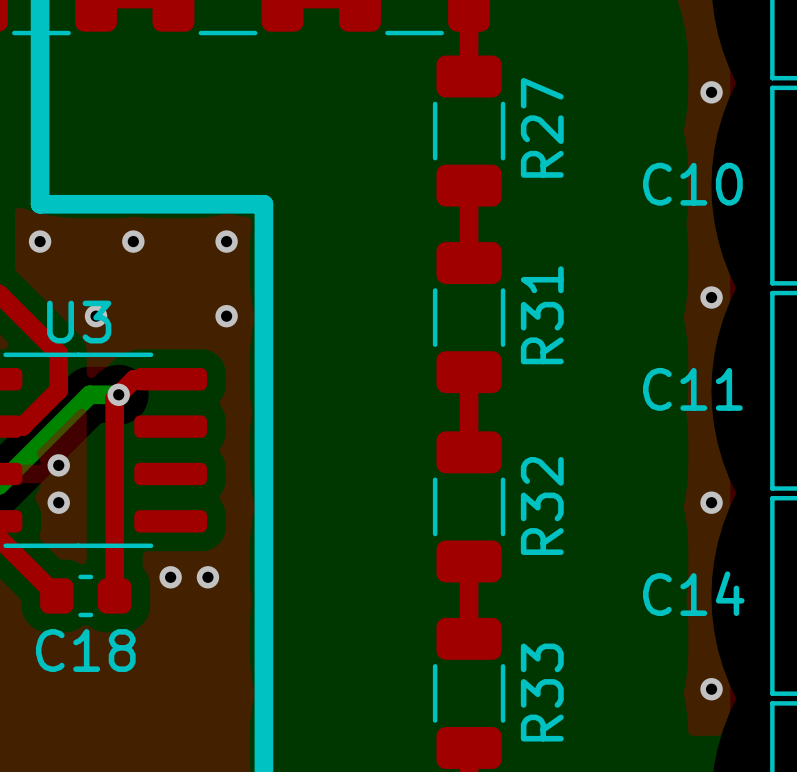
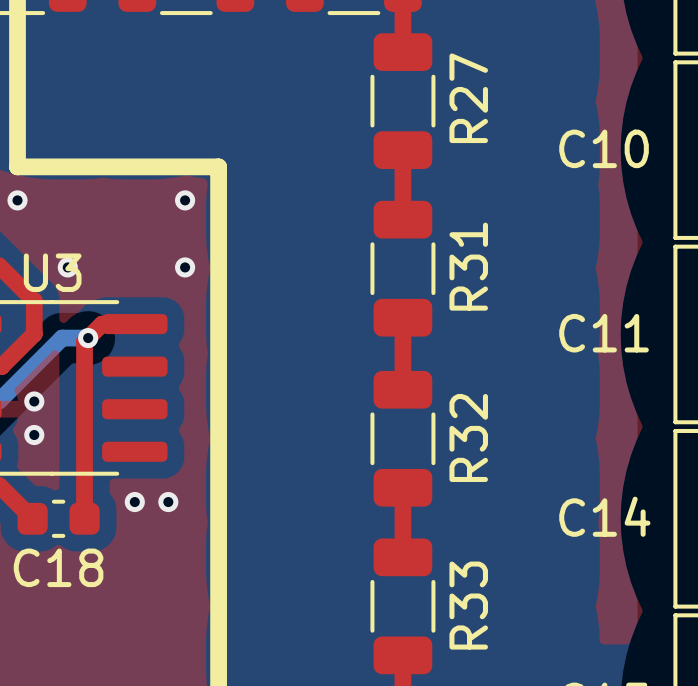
via: (711, 92) -> none
via: (133, 241) -> none
via: (711, 297) -> none
via: (711, 502) -> none
via: (711, 689) -> none

